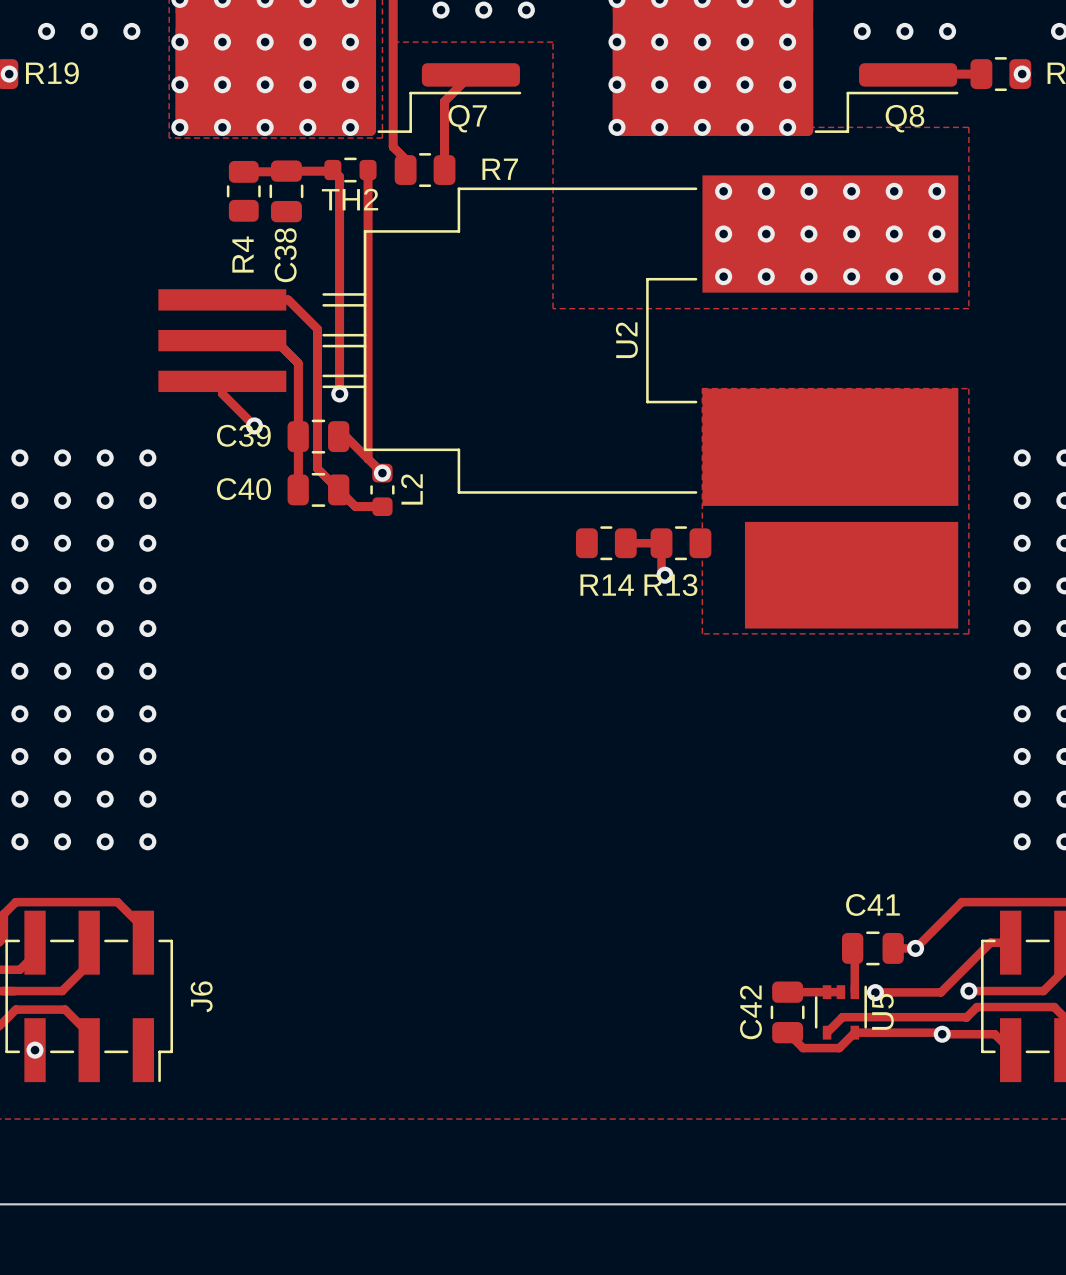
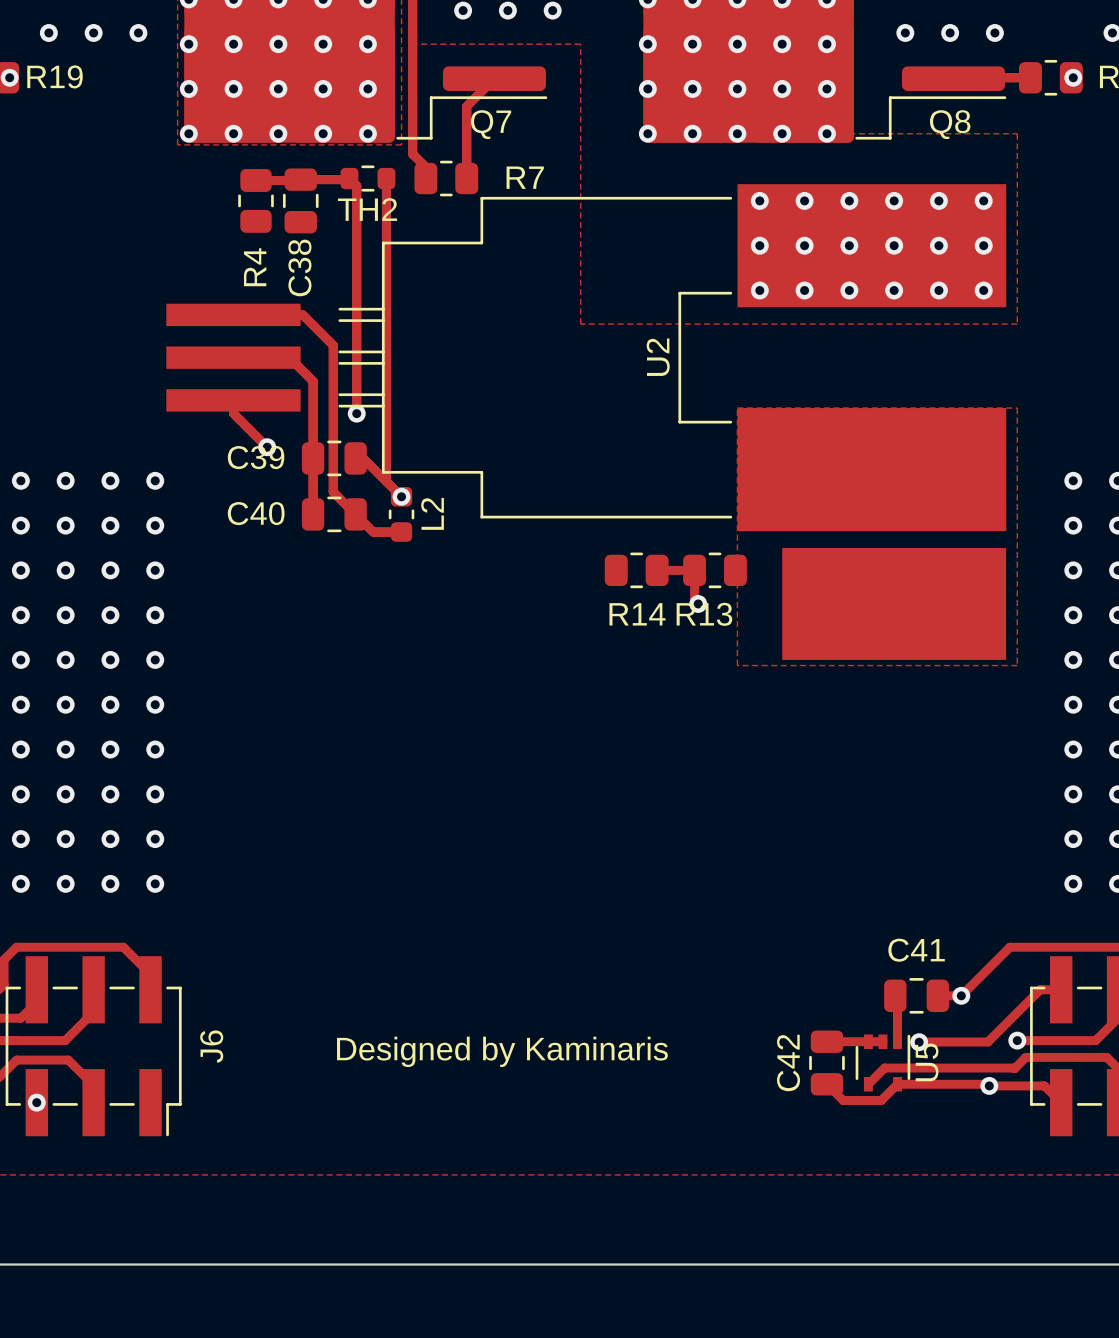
text: none -> Designed by Kaminaris (502, 1051)

